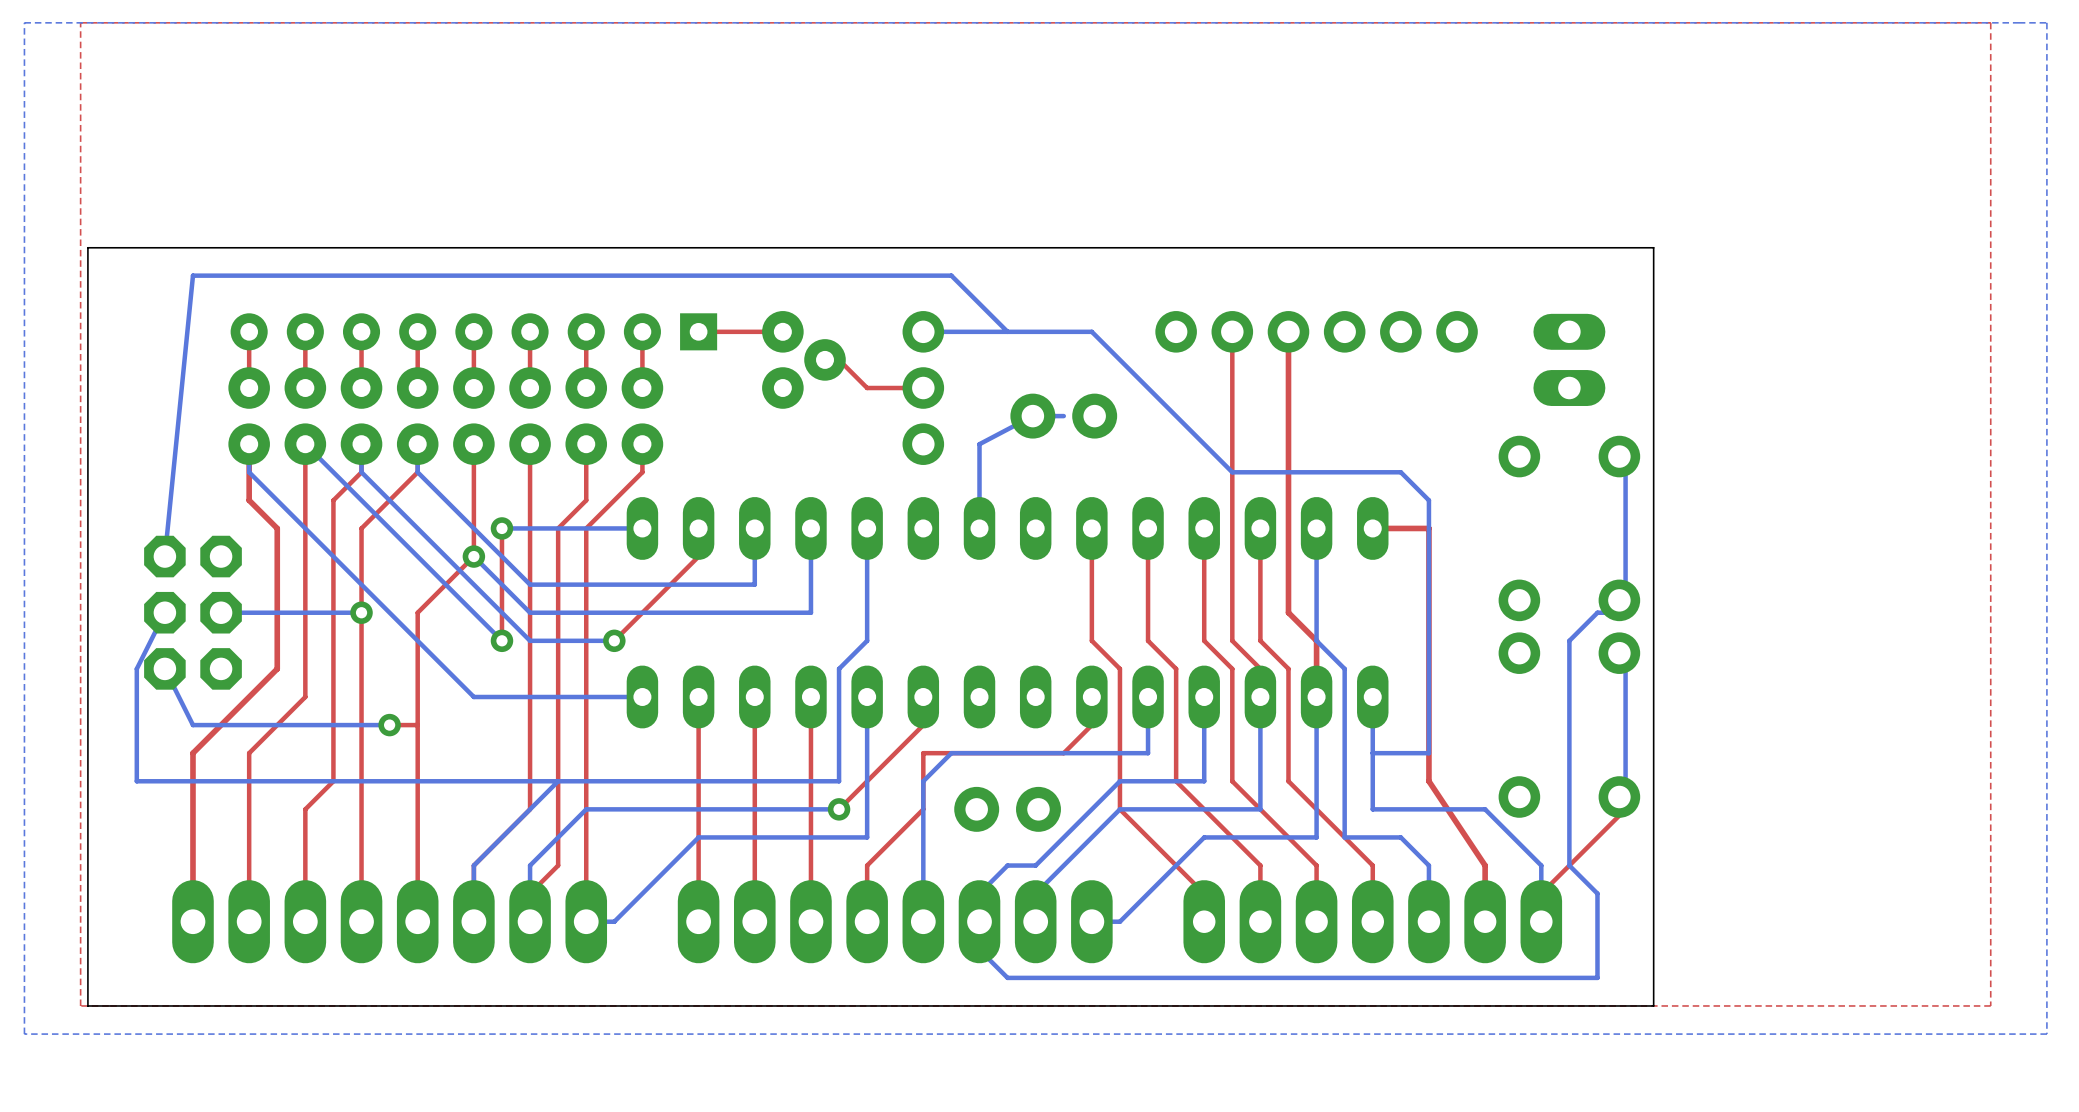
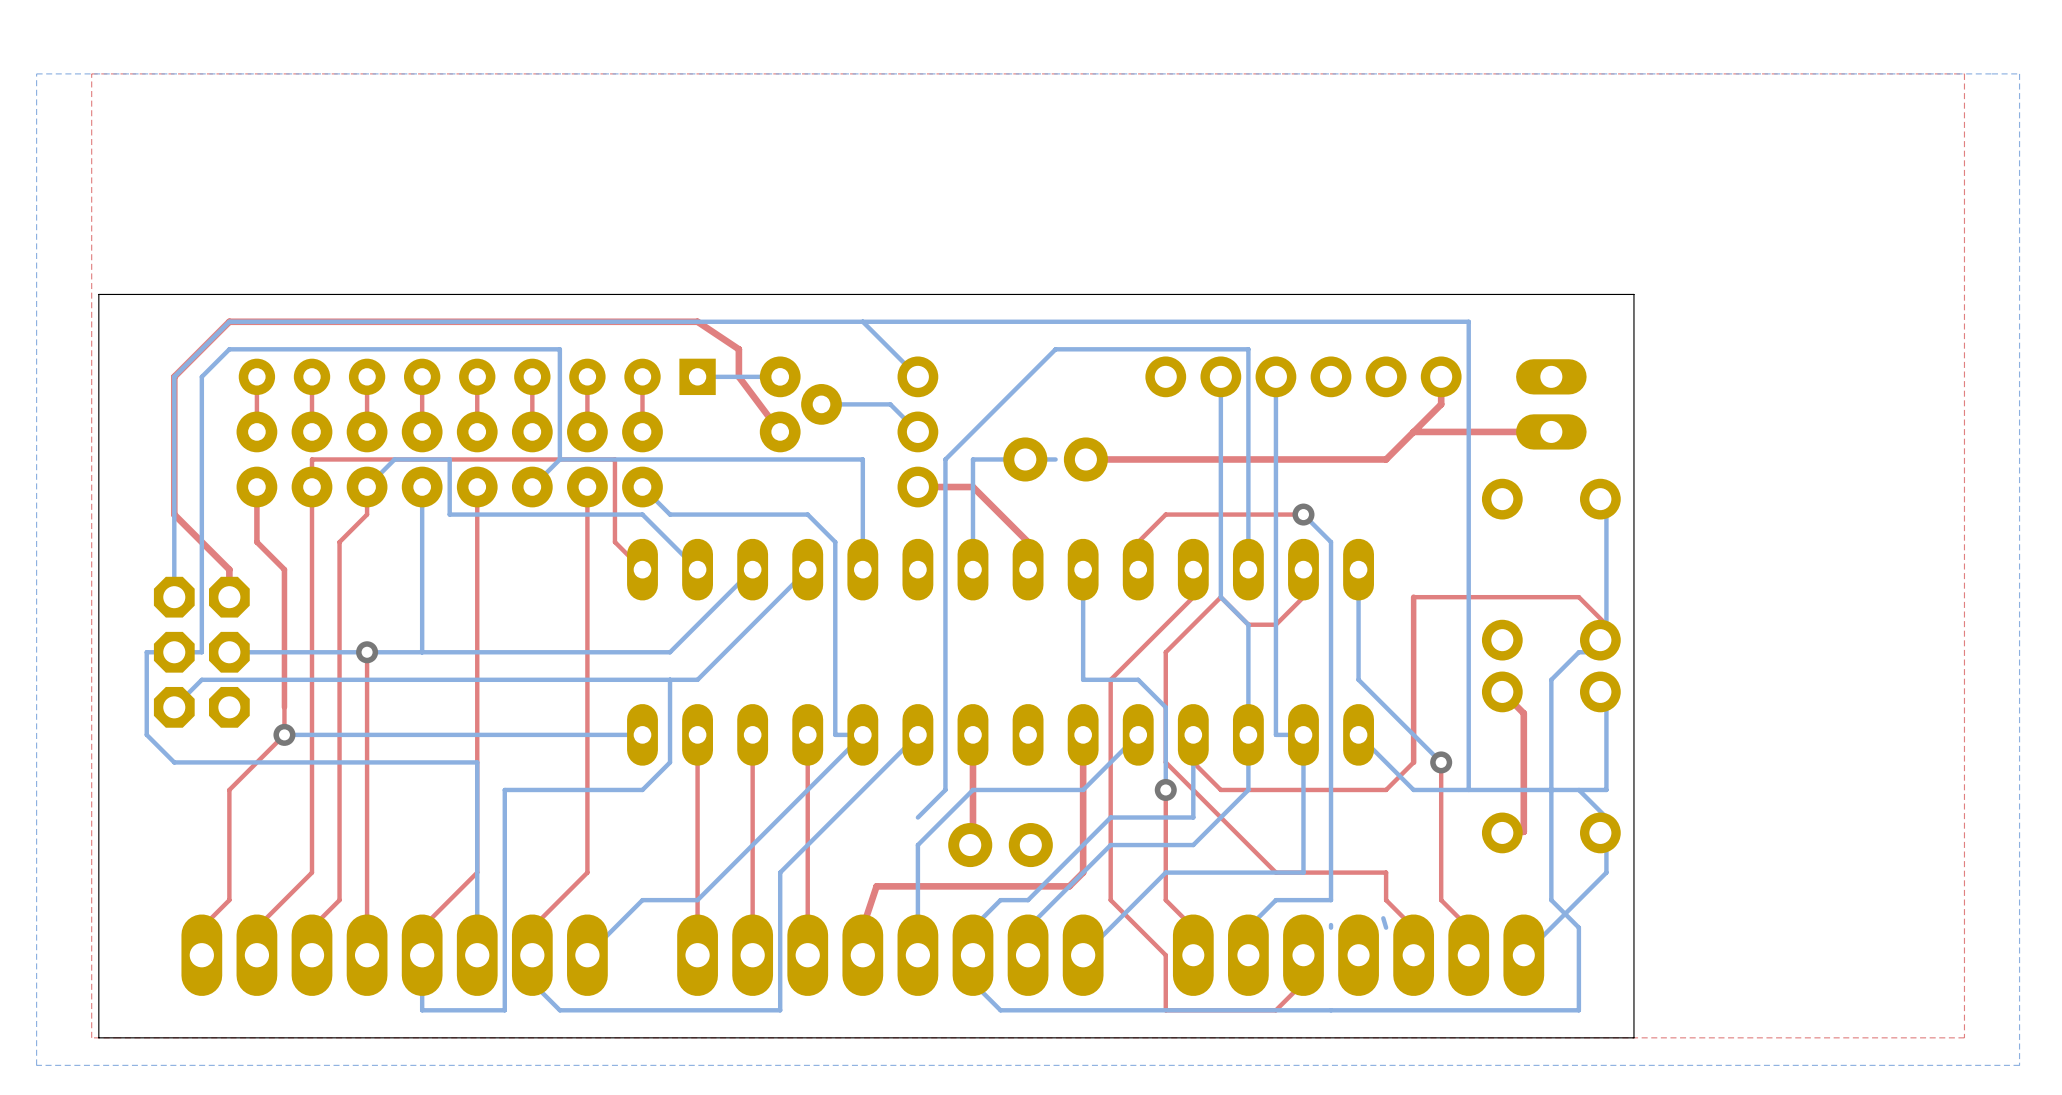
bottom track: (221, 275) (192, 275) (164, 556) -> (229, 321) (174, 376) (174, 597)
bottom track: (951, 275) (1007, 331) -> (945, 321) (1468, 321) (1468, 789)
bottom track: none -> (780, 376) (697, 376)
top track: (782, 331) (698, 331) -> none
bottom track: (923, 331) (1091, 331) (1232, 472) (1400, 472) (1428, 500) (1428, 753) (1372, 753) -> (917, 376) (862, 321)
bottom track: none -> (1220, 376) (1220, 597) (1248, 624) (1248, 734)
top track: (1232, 331) (1232, 640) (1260, 668) (1260, 696) -> none
bottom track: none -> (1275, 376) (1275, 734) (1303, 734)
top track: (1288, 331) (1288, 612) (1316, 640) (1316, 696) -> none
top track: none -> (1441, 376) (1441, 404) (1386, 459) (1085, 459)
bottom track: none -> (821, 404) (890, 404) (917, 431)
top track: (825, 359) (839, 359) (867, 388) (923, 388) -> none
top track: none -> (780, 431) (738, 376) (738, 349) (697, 321) (229, 321) (174, 376) (174, 514) (229, 569) (229, 597)
top track: none -> (1551, 431) (1413, 431)
bottom track: none -> (559, 459) (862, 459) (862, 569)
bottom track: none -> (559, 459) (532, 487)
bottom track: (1032, 416) (979, 444) -> (1025, 459) (972, 459) (972, 487)
bottom track: (249, 444) (249, 472) (473, 696) -> (284, 734) (477, 734)
bottom track: (305, 444) (501, 640) -> none
top track: none -> (312, 487) (312, 459) (614, 459) (614, 542) (642, 569)
bottom track: (361, 444) (361, 472) (530, 640) -> (367, 487) (394, 459) (449, 459) (449, 514) (642, 514) (697, 569)
top track: (417, 444) (417, 472) (361, 528) (361, 612) -> none
top track: (530, 444) (530, 809) (473, 865) (473, 921) -> none
top track: (642, 444) (642, 472) (586, 528) -> (587, 542) (587, 569)
top track: none -> (917, 487) (972, 487) (1028, 542) (1028, 569)
bottom track: (417, 472) (530, 584) (754, 584) (754, 528) -> (422, 514) (422, 652)
top track: none -> (1303, 514) (1165, 514) (1138, 542) (1138, 569)
via: none -> (1303, 514)
top track: (586, 500) (558, 528) (558, 865) -> none
top track: (501, 528) (501, 640) -> none
via: (501, 528) -> none
bottom track: (642, 528) (501, 528) -> none
top track: (698, 528) (698, 556) (614, 640) -> none
bottom track: (810, 528) (810, 612) (670, 612) -> (752, 569) (670, 652)
bottom track: none -> (807, 569) (697, 679) (614, 679)
bottom track: (867, 528) (867, 640) (839, 668) -> (642, 487) (670, 514) (807, 514) (835, 542) (835, 707)
bottom track: none -> (1083, 569) (1083, 679) (1138, 679) (1165, 707) (1165, 789)
top track: (1091, 528) (1091, 640) (1119, 668) -> (1193, 597) (1110, 679) (1110, 707)
top track: (1148, 528) (1148, 640) (1176, 668) -> (1303, 569) (1303, 597) (1275, 624) (1248, 624) (1220, 597) (1165, 652) (1165, 707)
top track: (1260, 528) (1260, 640) (1288, 668) (1288, 781) (1372, 865) (1372, 921) -> none
bottom track: (1316, 528) (1316, 640) (1344, 668) -> (1303, 514) (1331, 542) (1331, 707)
bottom track: none -> (1358, 569) (1358, 679) (1441, 762)
top track: (1372, 528) (1428, 528) (1428, 556) -> (1600, 640) (1606, 624) (1578, 597) (1413, 597)
bottom track: (473, 556) (530, 612) -> (367, 652) (532, 652)
top track: (473, 556) (417, 612) (417, 893) -> (477, 597) (477, 872) (422, 927)
via: (473, 556) -> none
top track: (1204, 556) (1204, 640) (1232, 668) (1232, 781) -> none
bottom track: (164, 612) (136, 668) -> (559, 459) (559, 349) (229, 349) (201, 376) (201, 652) (146, 652) (146, 707)
via: (501, 640) -> none
bottom track: none -> (532, 679) (201, 679) (174, 707)
via: (614, 640) -> none
bottom track: none -> (670, 679) (670, 762) (642, 789) (504, 789) (504, 1010) (422, 1010) (422, 955)
top track: none -> (1502, 691) (1523, 713) (1523, 831) (1502, 832)
bottom track: (164, 668) (192, 725) -> (146, 734) (174, 762) (201, 762)
top track: (277, 668) (192, 753) (192, 893) -> (284, 707) (284, 734) (229, 789) (229, 900) (201, 927)
via: none -> (284, 734)
top track: (305, 696) (249, 753) (249, 893) -> (312, 734) (312, 845)
bottom track: (839, 696) (839, 781) (136, 781) (136, 696) -> none
bottom track: (867, 696) (867, 837) (698, 837) (614, 921) (586, 921) -> (835, 734) (862, 734) (697, 900) (642, 900) (587, 955)
top track: (923, 696) (923, 725) (839, 809) -> none
top track: none -> (972, 734) (972, 842) (970, 845)
bottom track: (1148, 696) (1148, 753) (1091, 753) -> (1138, 734) (1083, 789)
top track: none -> (1193, 734) (1193, 762) (1220, 789) (1386, 789) (1413, 762)
bottom track: (1372, 696) (1372, 809) (1485, 809) (1541, 865) (1541, 921) -> (1358, 734) (1413, 789) (1606, 789)
via: (389, 725) -> none
top track: (417, 725) (389, 725) -> none
top track: (1091, 725) (1063, 753) (923, 753) (923, 809) (867, 865) (867, 893) -> (1083, 762) (1083, 872) (1069, 886) (876, 886) (862, 927)
top track: (1176, 725) (1176, 753) -> (1165, 762) (1220, 817)
top track: (1428, 725) (1428, 781) (1485, 865) (1485, 893) -> (1441, 762) (1441, 900) (1468, 927)
via: none -> (1441, 762)
bottom track: (979, 753) (951, 753) -> (1248, 569) (1248, 349) (1055, 349) (945, 459) (945, 789)
via: none -> (1165, 789)
bottom track: (1260, 753) (1260, 809) (1204, 809) -> (1248, 789) (1193, 845)
bottom track: (1625, 753) (1625, 781) -> (1578, 789) (1606, 817)
top track: (333, 781) (305, 809) -> (339, 817) (339, 900) (312, 927)
bottom track: (558, 781) (473, 865) -> (394, 762) (477, 762) (477, 900)
bottom track: (923, 781) (923, 809) -> (972, 789) (917, 845)
top track: (1176, 781) (1260, 865) (1260, 921) -> none
bottom track: none -> (1600, 832) (1606, 845) (1606, 872) (1523, 955)
top track: (1619, 796) (1625, 809) (1541, 893) (1541, 921) -> none
bottom track: (839, 809) (586, 809) (530, 865) (530, 921) -> (917, 734) (780, 872) (780, 1010) (559, 1010) (532, 982) (532, 955)
via: (839, 809) -> none
top track: (1119, 809) (1176, 865) -> (1165, 817) (1165, 900)
top track: none -> (1110, 845) (1110, 900) (1165, 955) (1165, 1010) (1275, 1010) (1303, 982) (1303, 955)
top track: (305, 837) (305, 893) -> (312, 872) (256, 927)
top track: (586, 837) (586, 921) -> (587, 872) (559, 900)
bottom track: (1204, 837) (1119, 921) (1091, 921) -> (1193, 872) (1165, 872) (1083, 955)
top track: (1288, 837) (1316, 865) (1316, 921) -> (1275, 872) (1386, 872) (1386, 900) (1413, 927) (1413, 955)
bottom track: (1344, 837) (1400, 837) (1428, 865) (1428, 921) -> (1331, 872) (1331, 900) (1275, 900) (1248, 927) (1248, 955)
bottom track: none -> (1383, 918) (1386, 927)
bottom track: none -> (1331, 925) (1331, 927)

